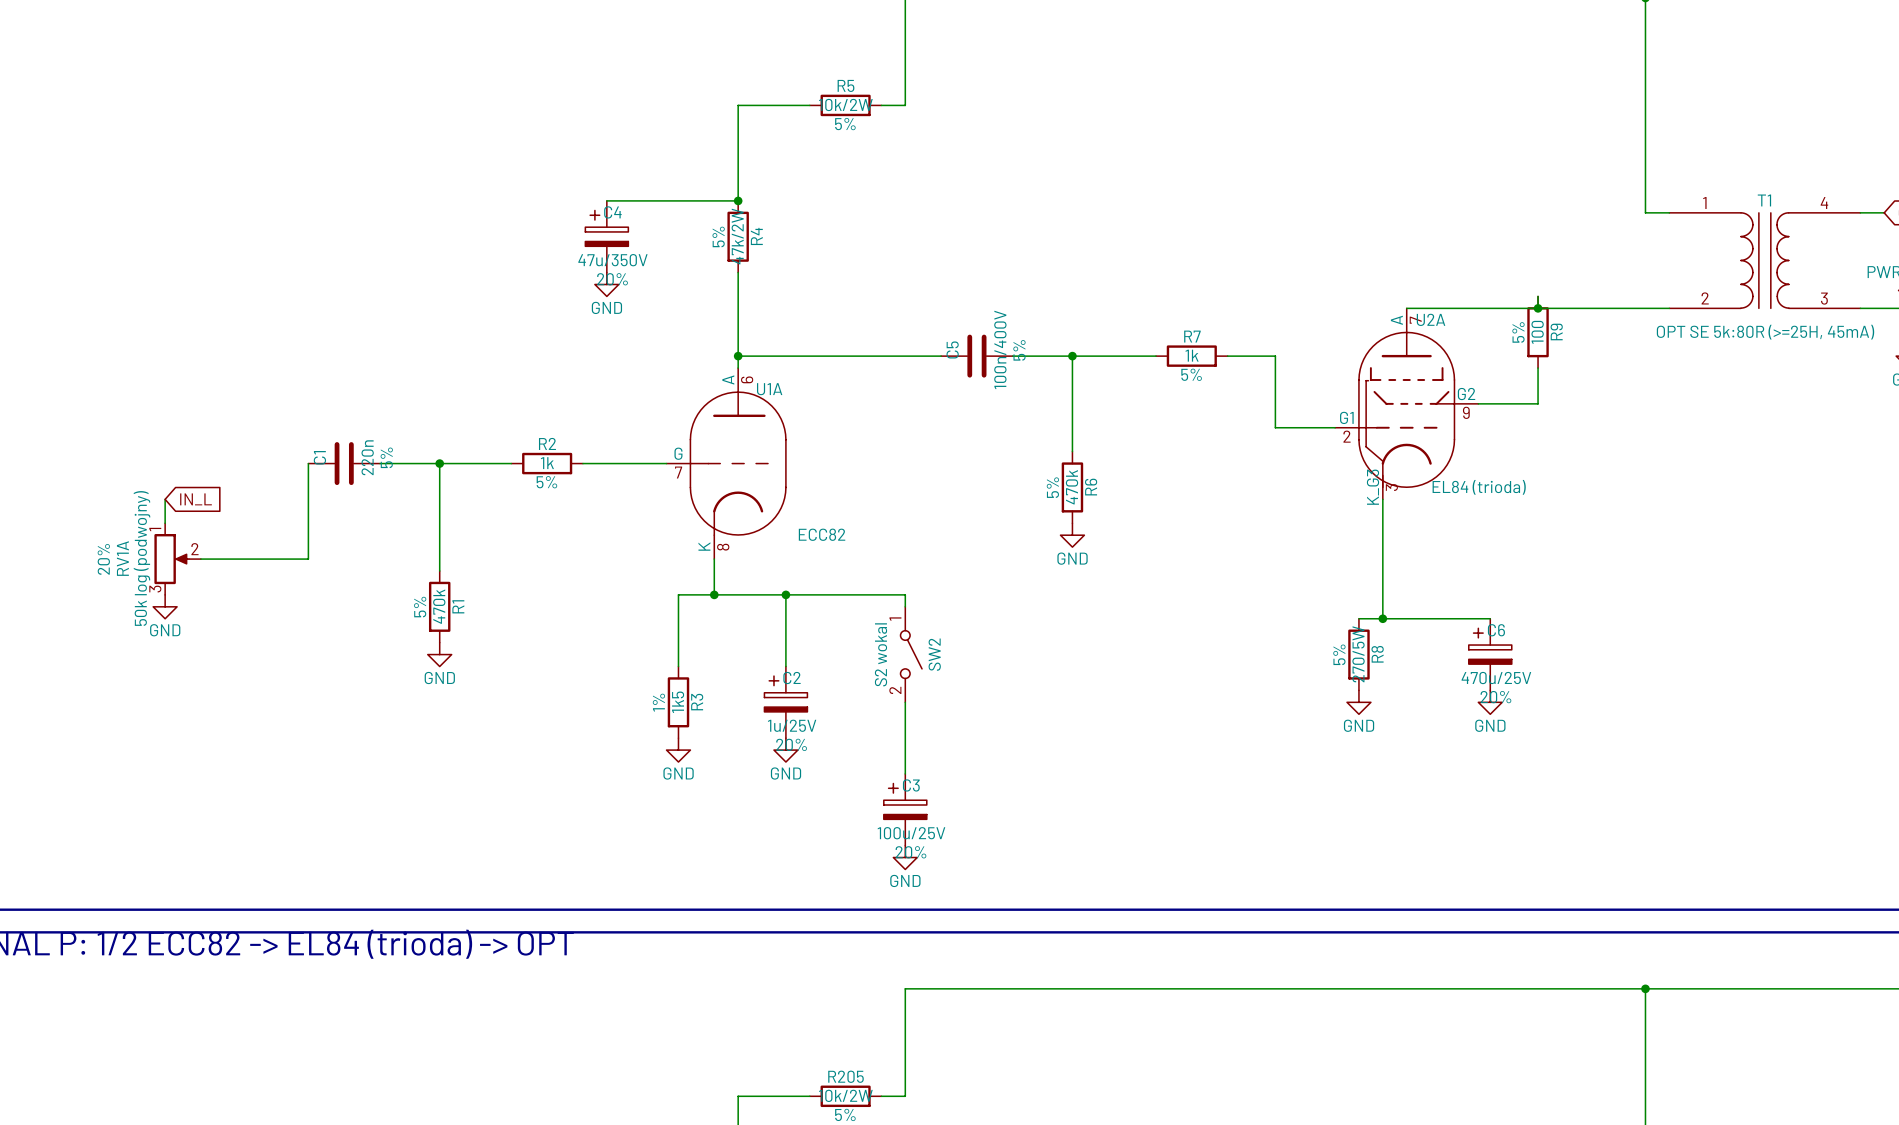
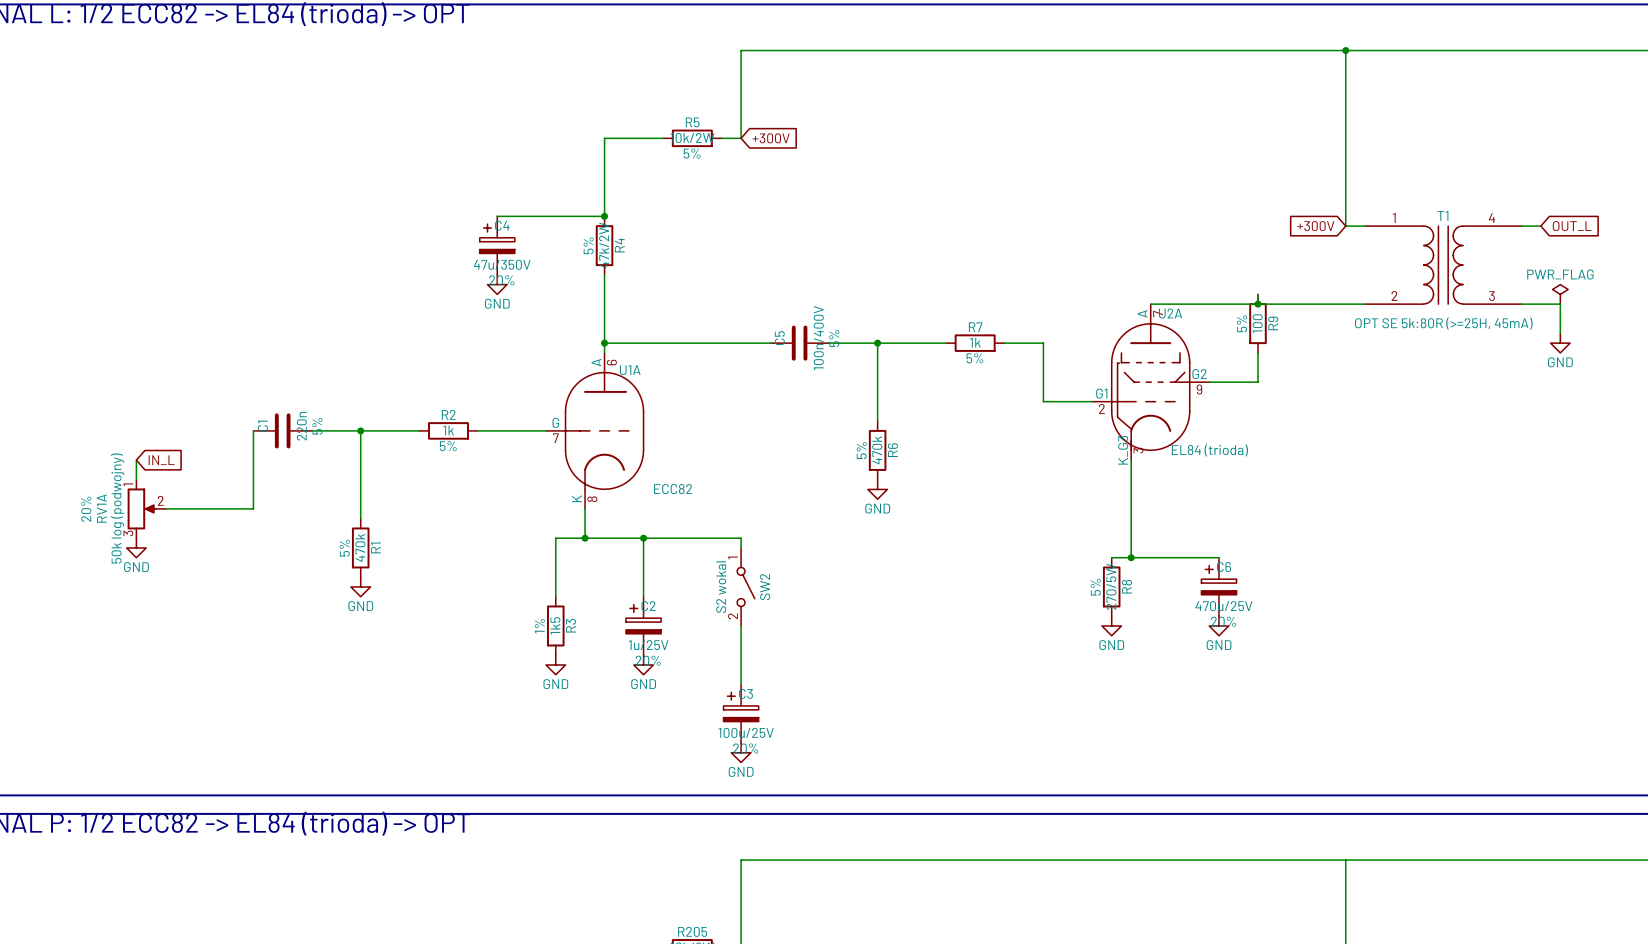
global label: none -> +300V (771, 138)
global label: none -> +300V (1315, 226)
junction: (1645, 988) -> none

